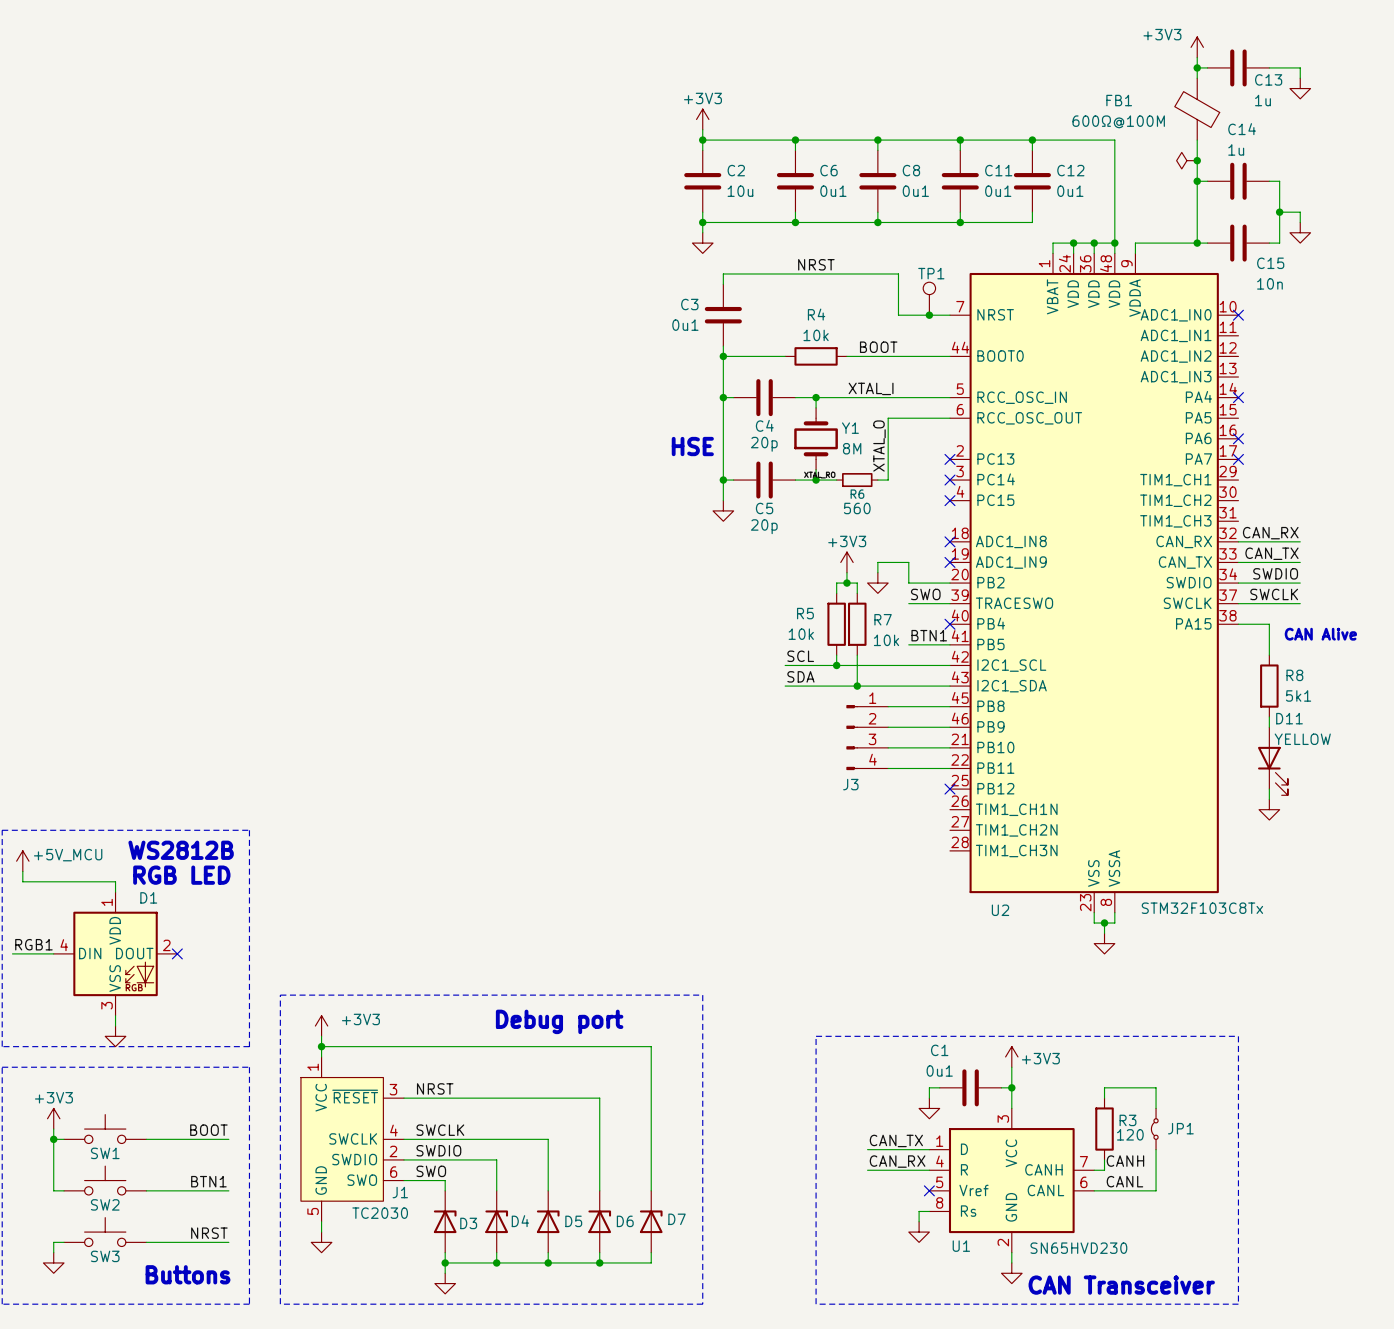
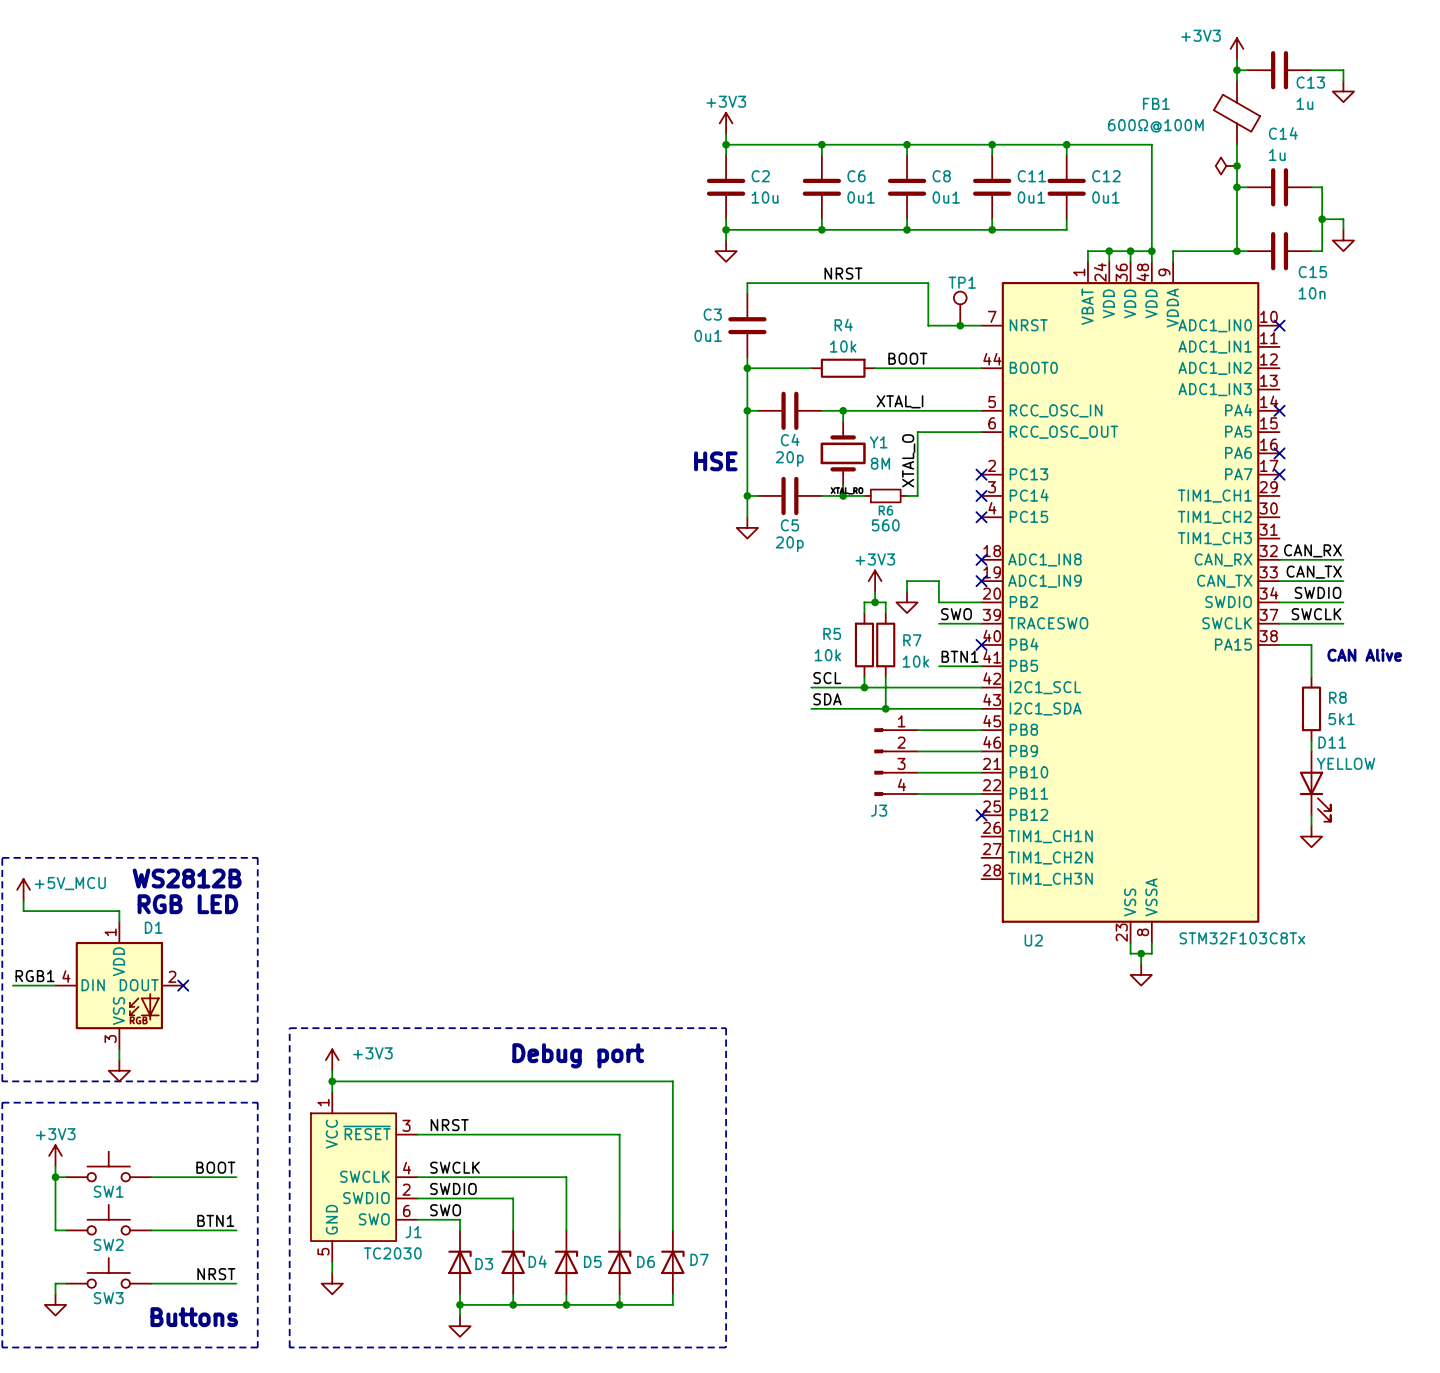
line: (816, 1036) (1238, 1036) (1238, 1304) (816, 1304) (816, 1036) -> none
power symbol: +3V3 (1011, 1056) -> none
wire: (1011, 1067) (1011, 1108) -> none
wire: (939, 1087) (929, 1087) (929, 1098) -> none
C1: 0u1 (970, 1087) -> none
wire: (1001, 1087) (1011, 1087) -> none
junction: (1011, 1087) -> none
wire: (1104, 1098) (1104, 1087) (1156, 1087) (1156, 1108) -> none
power symbol: (929, 1108) -> none
R3: 120 (1104, 1129) -> none
JP1: (1154, 1129) -> none
label: CAN_TX (896, 1140) -> none
wire: (867, 1149) (929, 1149) -> none
wire: (1156, 1149) (1156, 1190) (1094, 1190) -> none
wire: (1104, 1159) (1104, 1170) (1094, 1170) -> none
label: CAN_RX (897, 1161) -> none
label: CANH (1125, 1161) -> none
wire: (867, 1170) (929, 1170) -> none
U1: SN65HVD230 (1011, 1180) -> none
label: CANL (1124, 1181) -> none
no-connect mark: (929, 1190) -> none
wire: (929, 1211) (919, 1211) (919, 1221) -> none
power symbol: (919, 1232) -> none
wire: (1011, 1252) (1011, 1262) -> none
power symbol: (1011, 1273) -> none
text: CAN Transceiver (1121, 1285) -> none

